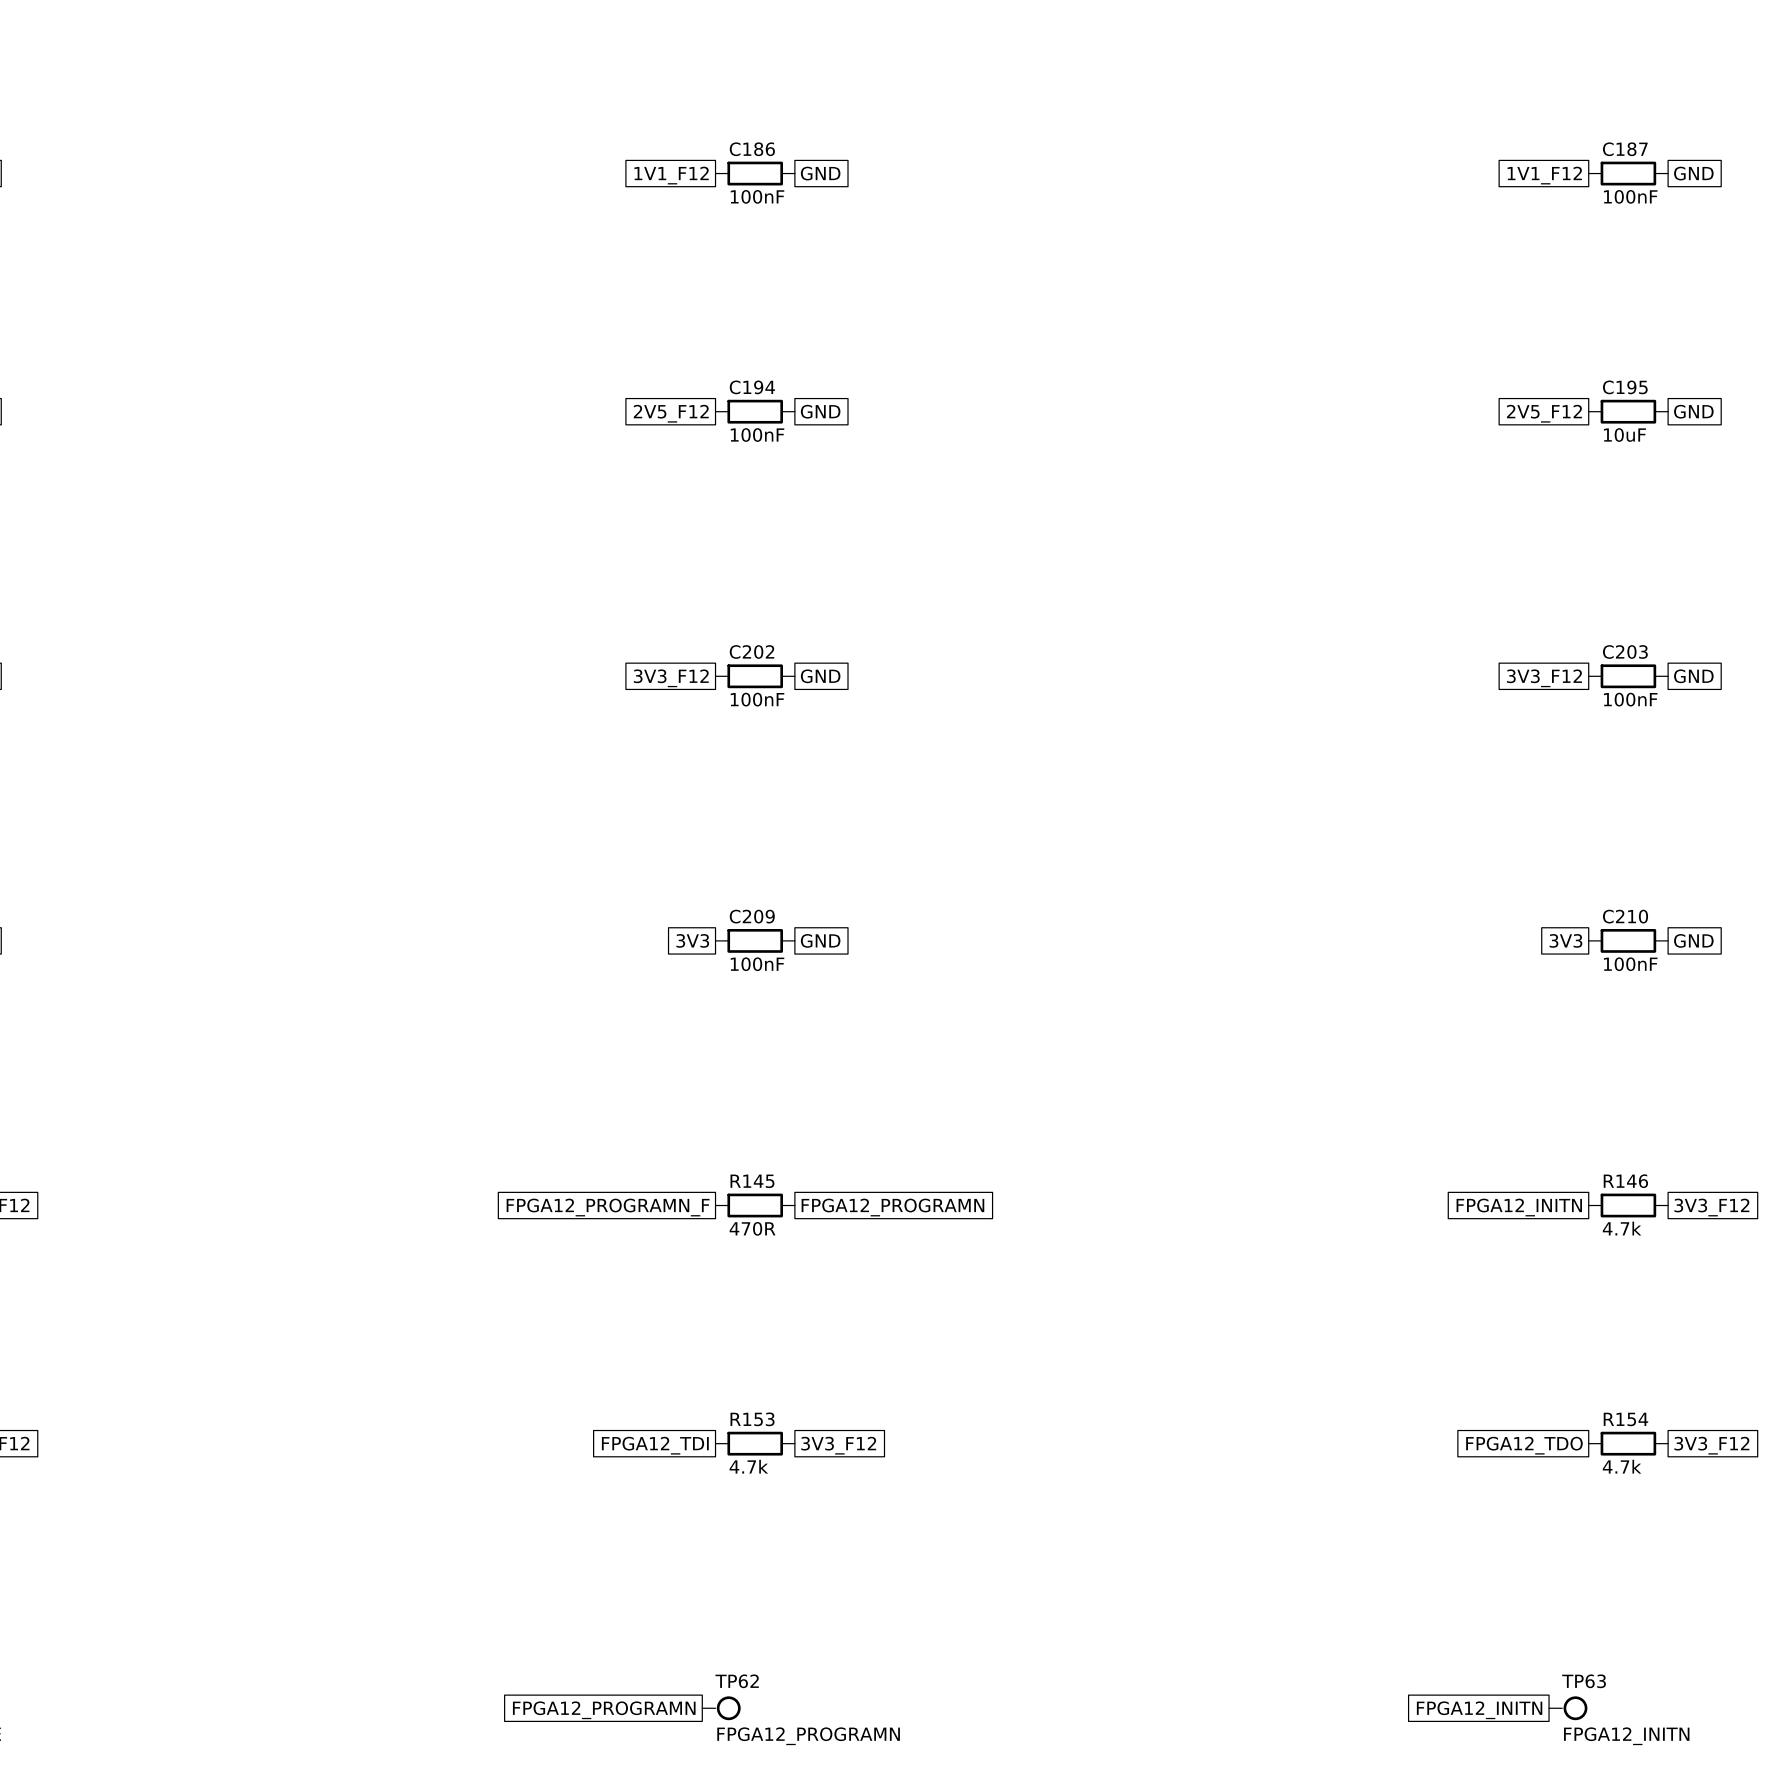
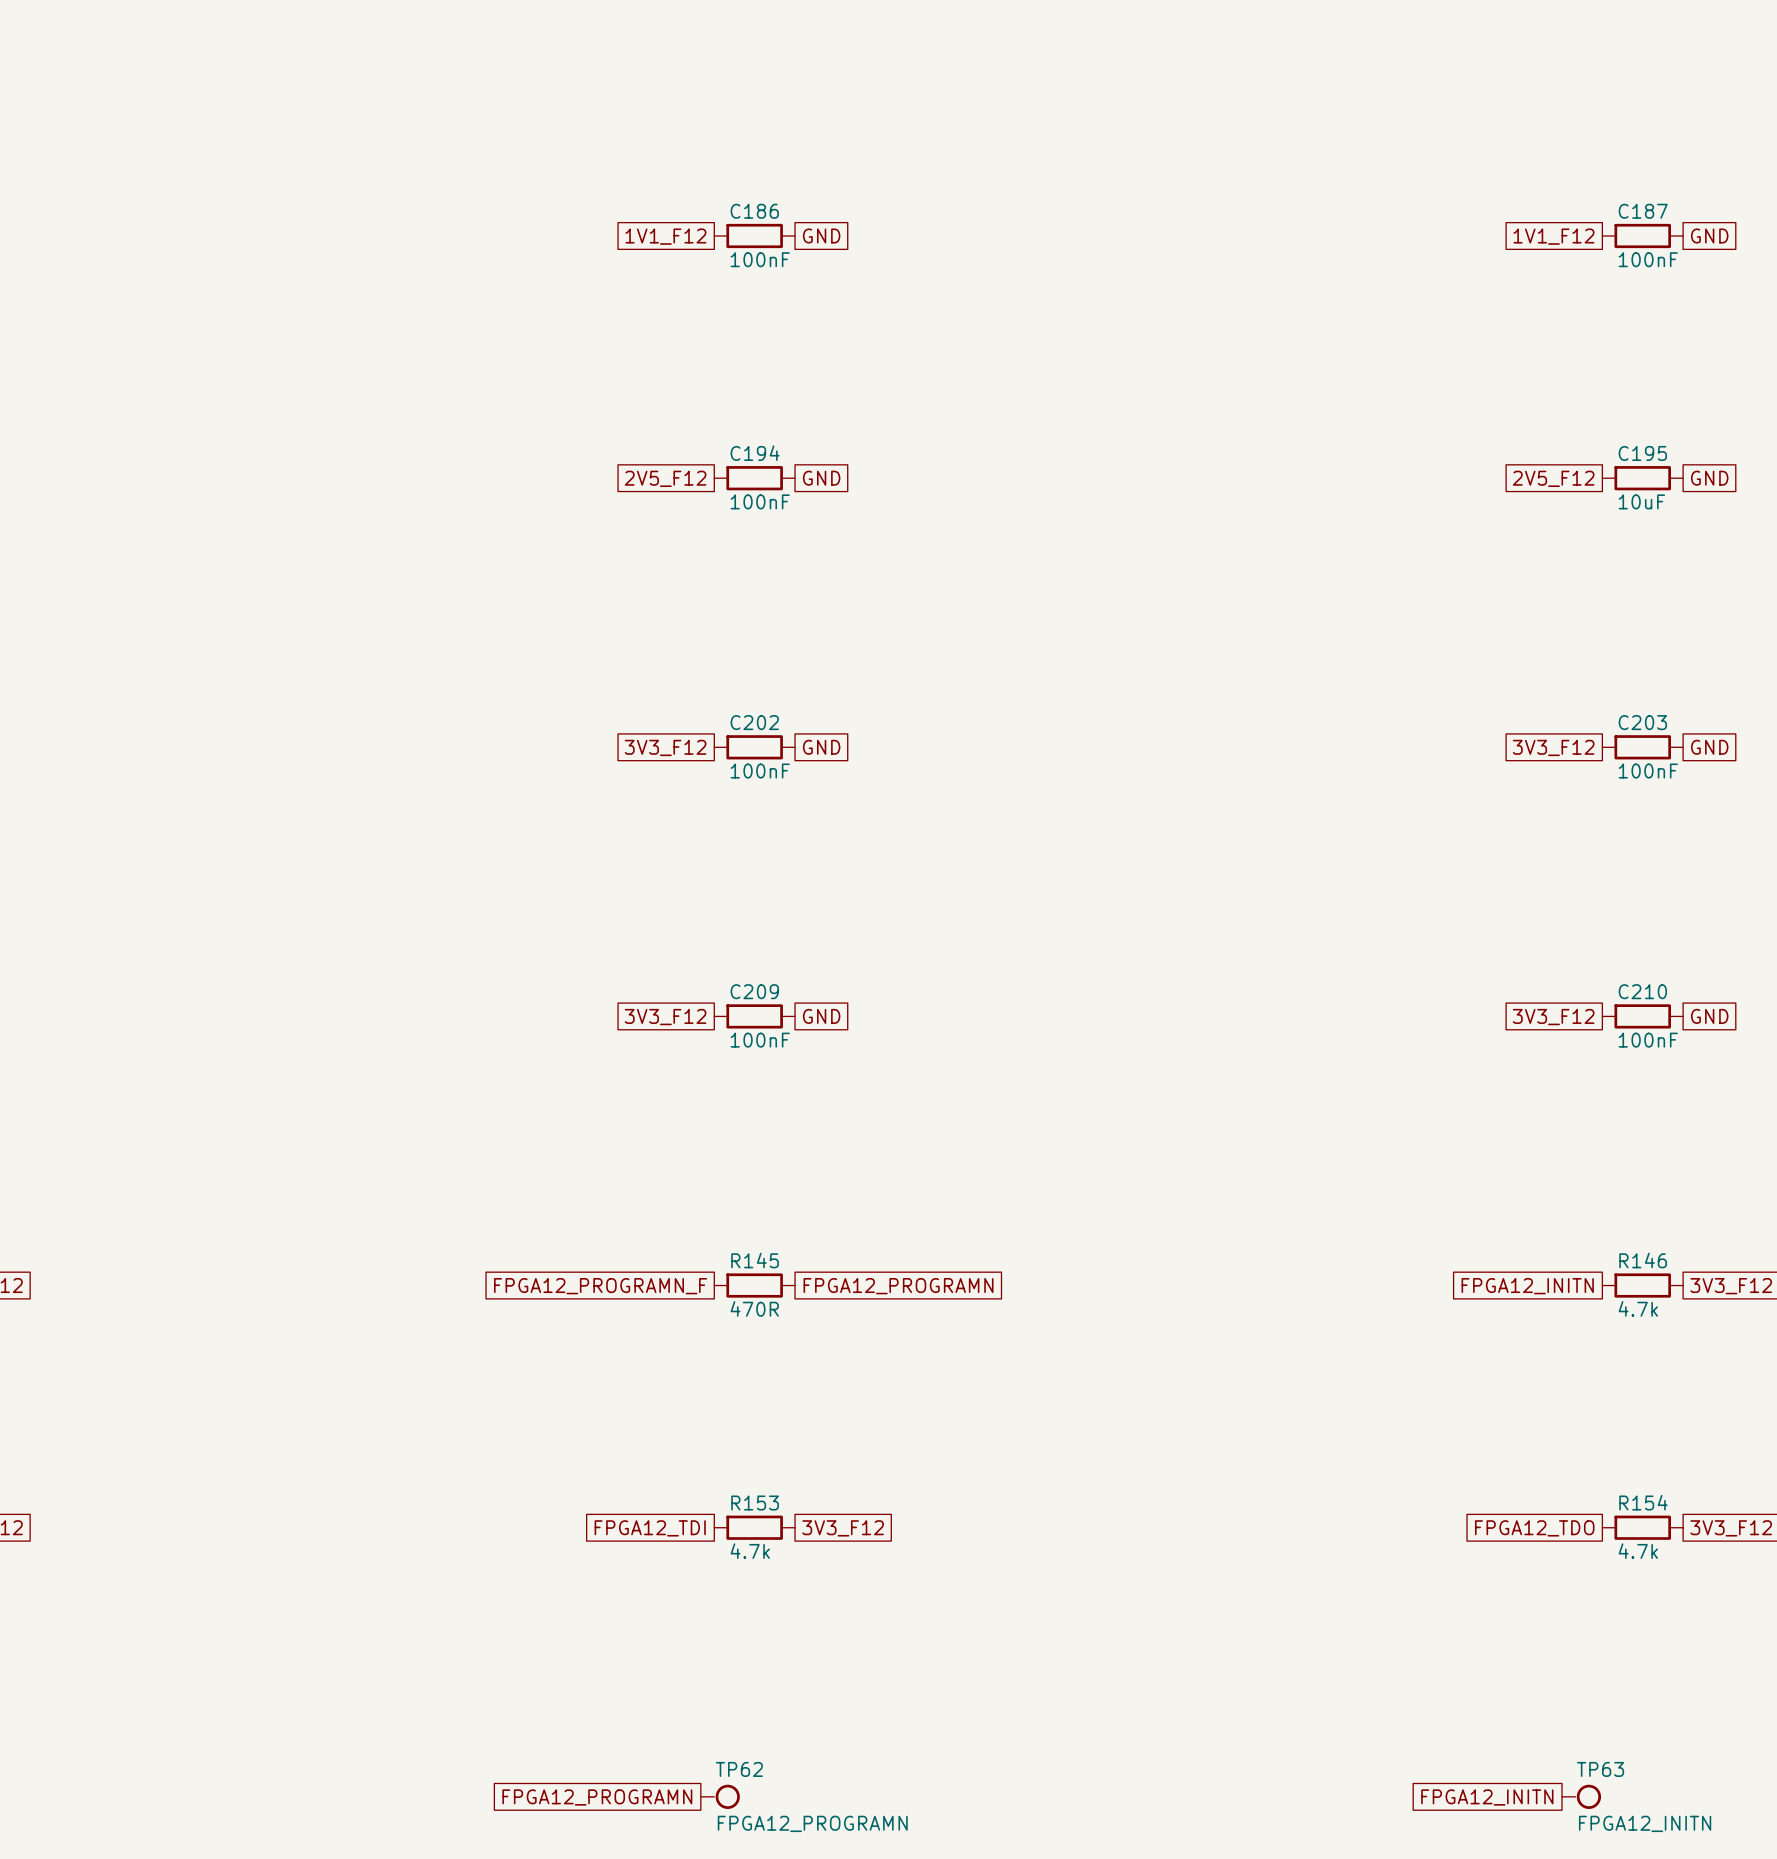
global label: 3V3 (692, 940) -> 3V3_F12 (665, 1017)
global label: 3V3 (1565, 940) -> 3V3_F12 (1553, 1017)

